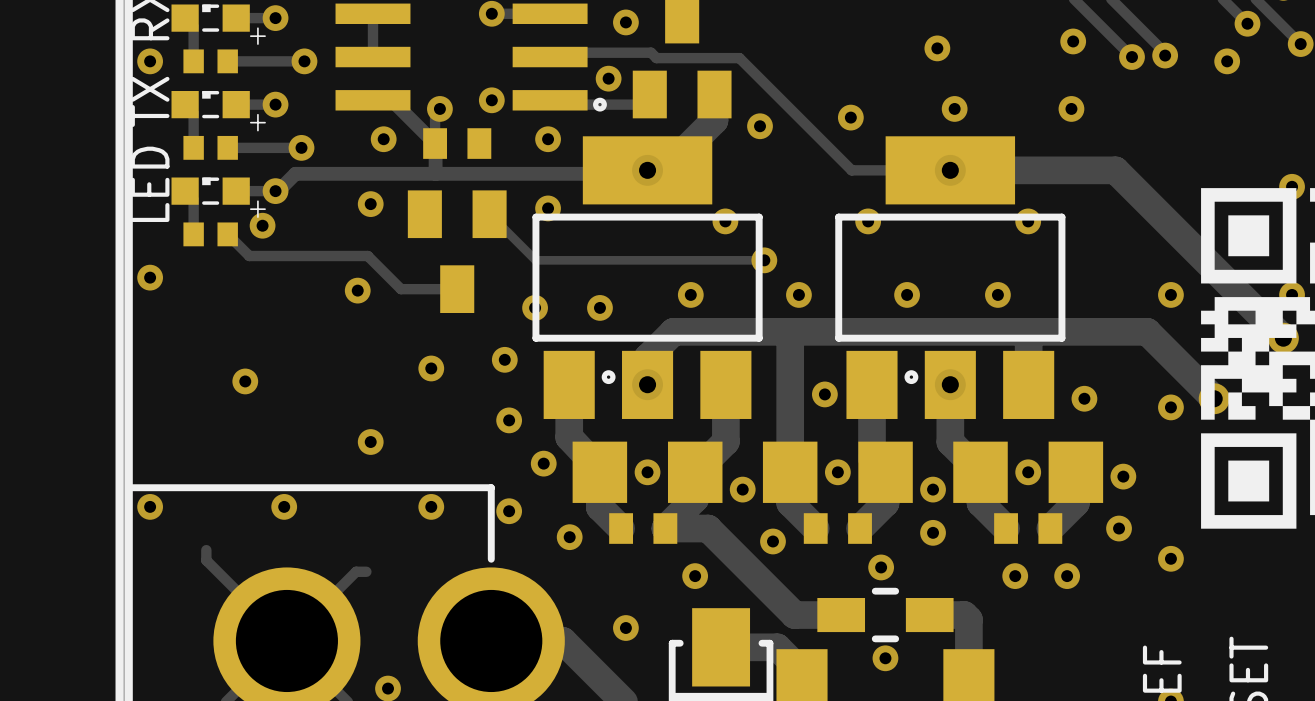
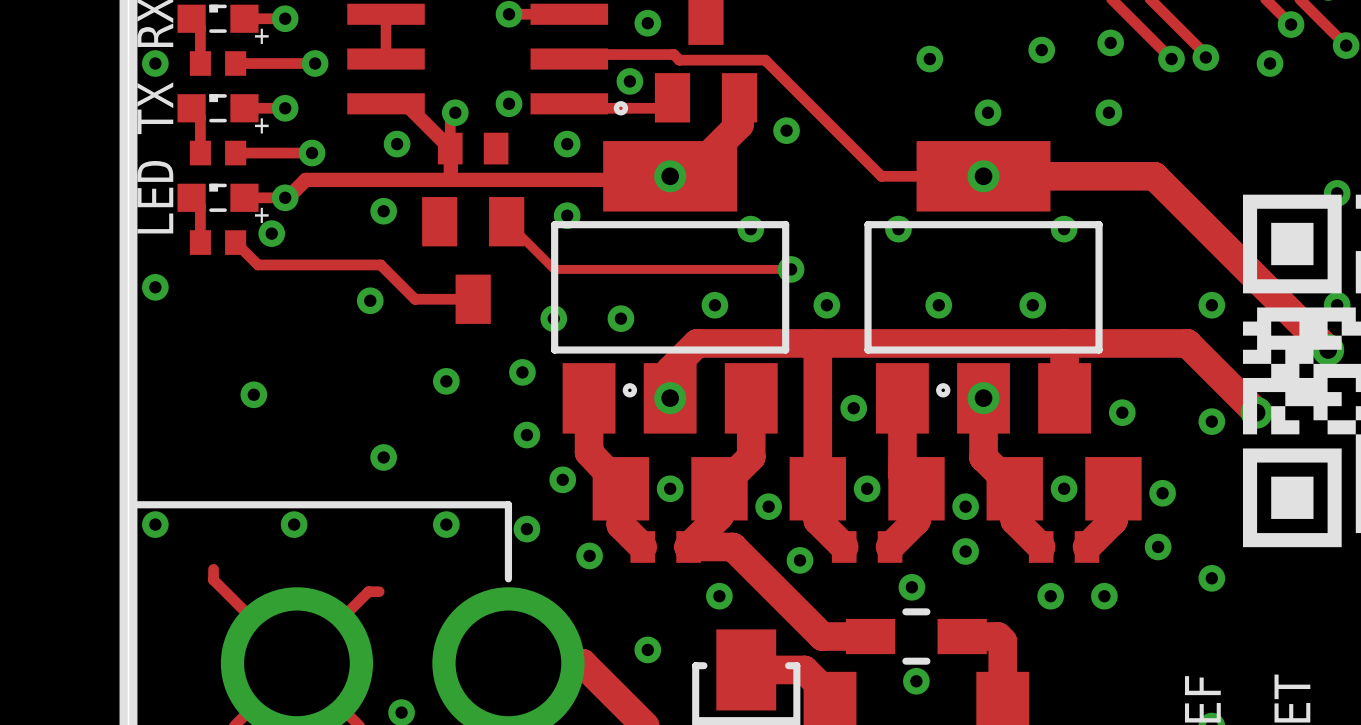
via: (937, 48) -> none
via: none -> (1041, 50)
via: none -> (929, 59)
via: (850, 117) -> none

